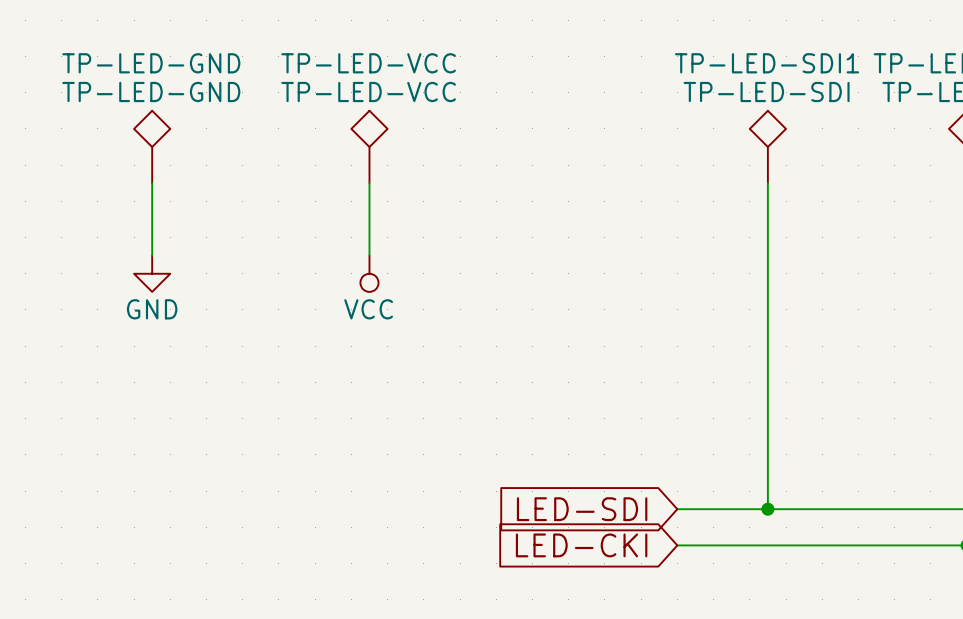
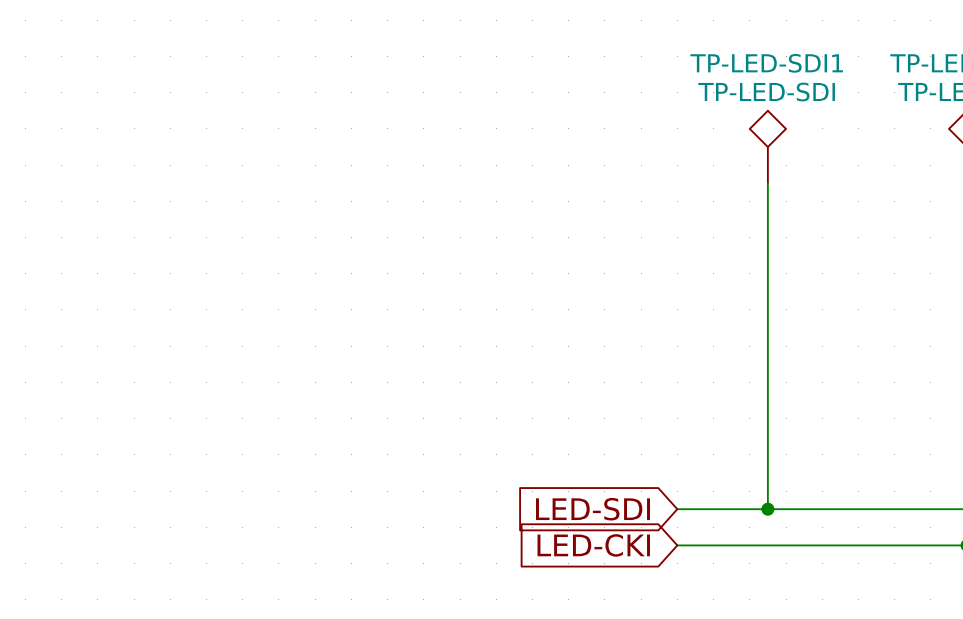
TP-LED-GND: TP-LED-GND (152, 147) -> none
TP-LED-VCC: TP-LED-VCC (369, 147) -> none
wire: (152, 183) (152, 255) -> none
wire: (369, 183) (369, 255) -> none
power symbol: GND (152, 273) -> none
power symbol: VCC (369, 273) -> none

